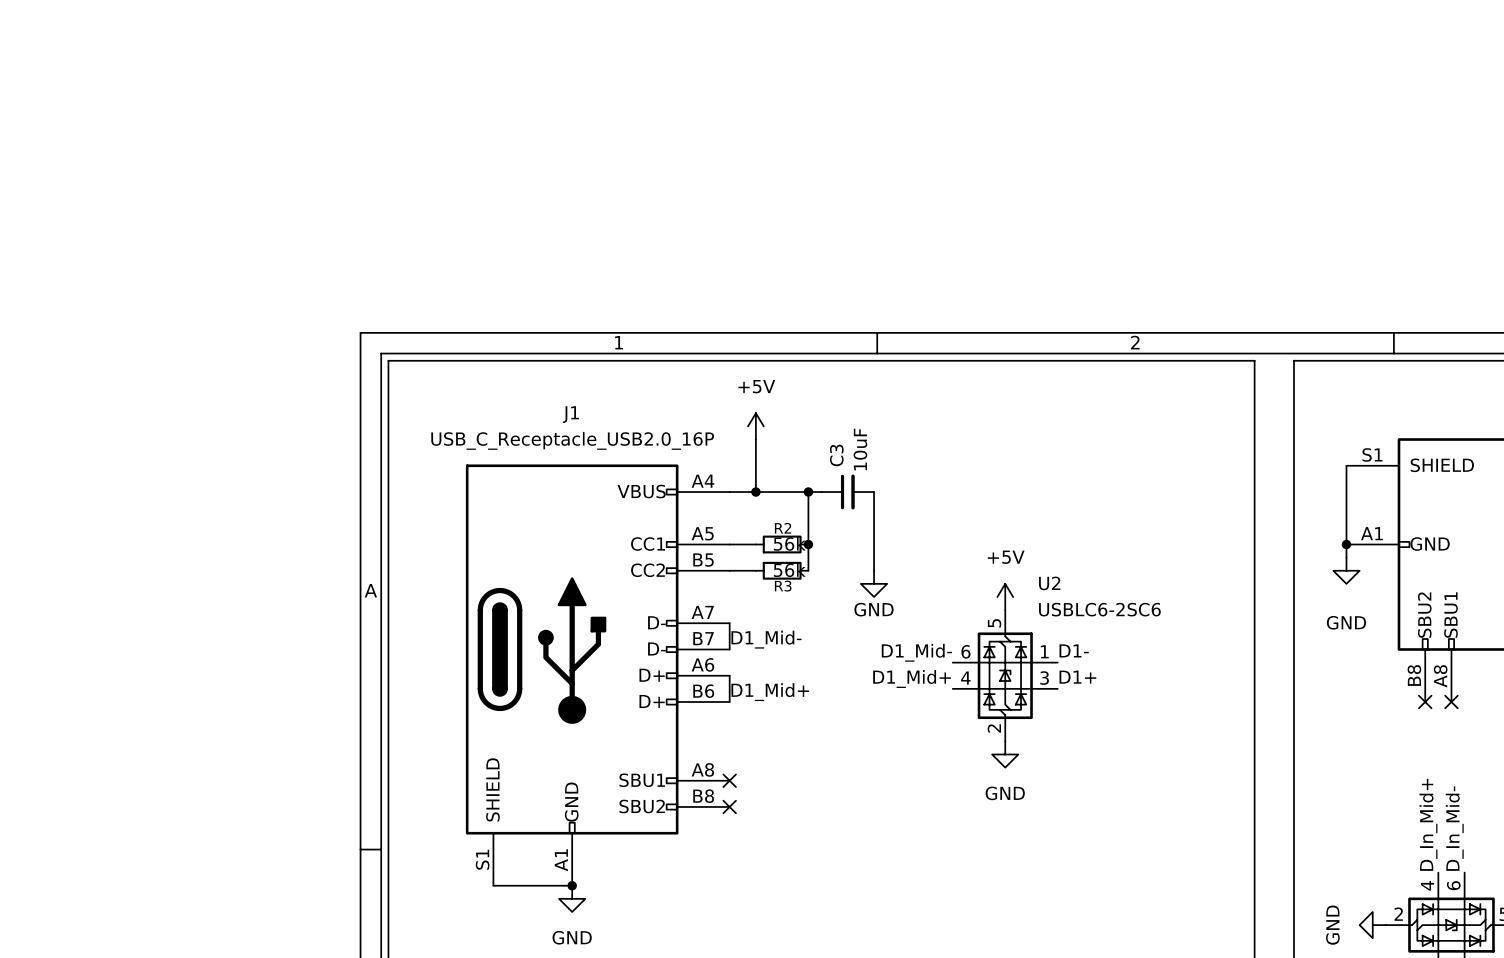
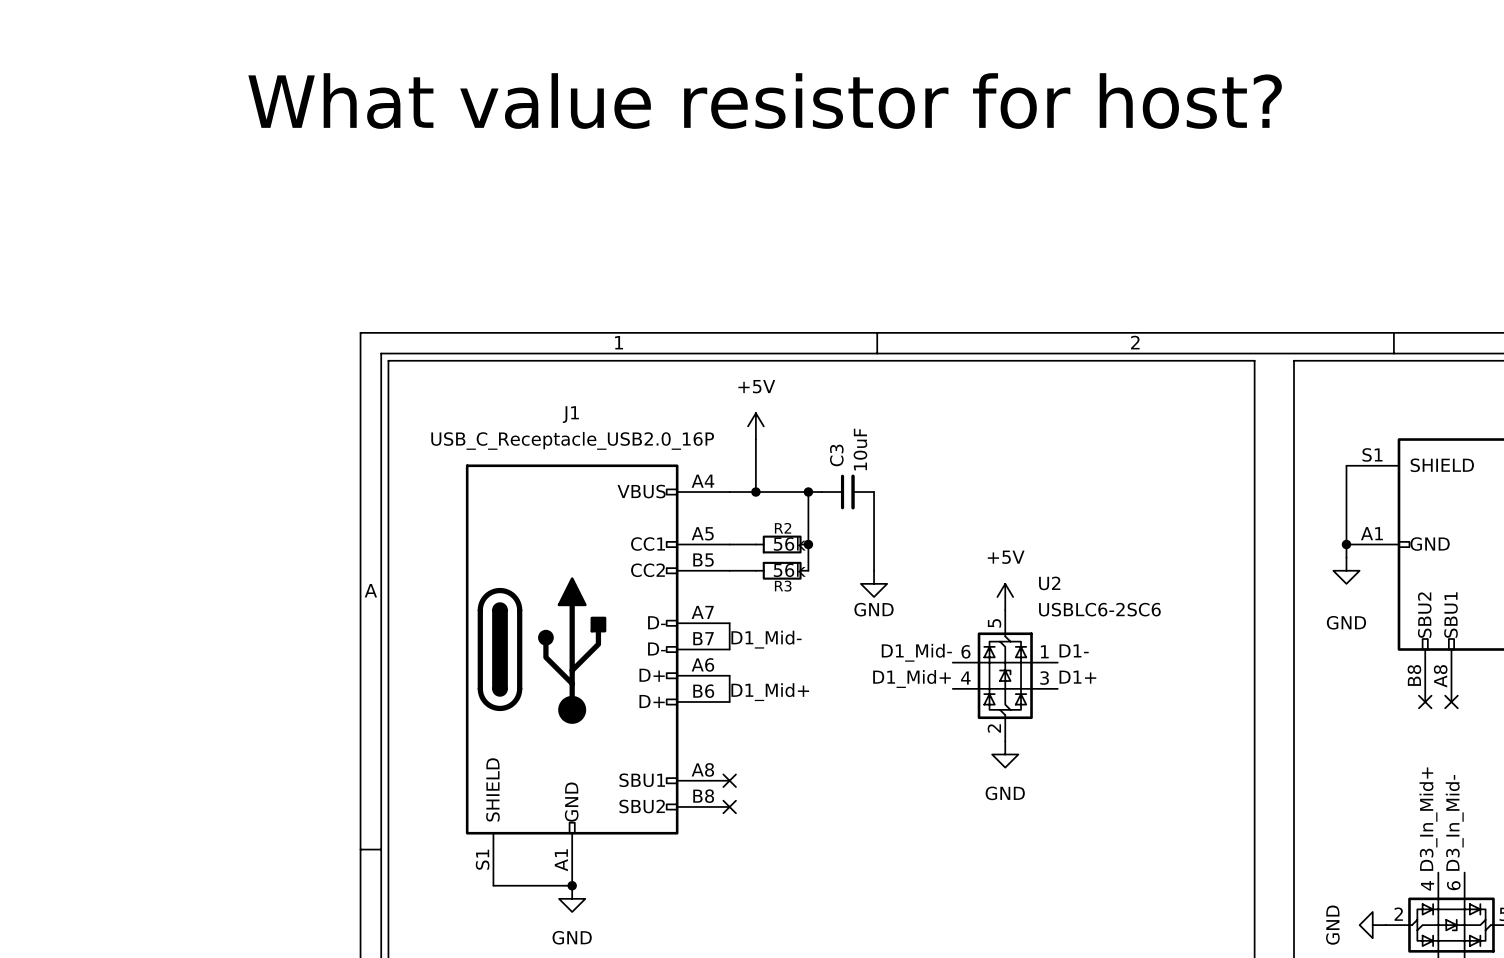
text: none -> What value resistor for host? (765, 101)
label: D_In_Mid+ (1428, 824) -> D3_In_Mid+ (1428, 819)
label: D_In_Mid- (1454, 828) -> D3_In_Mid- (1454, 822)

